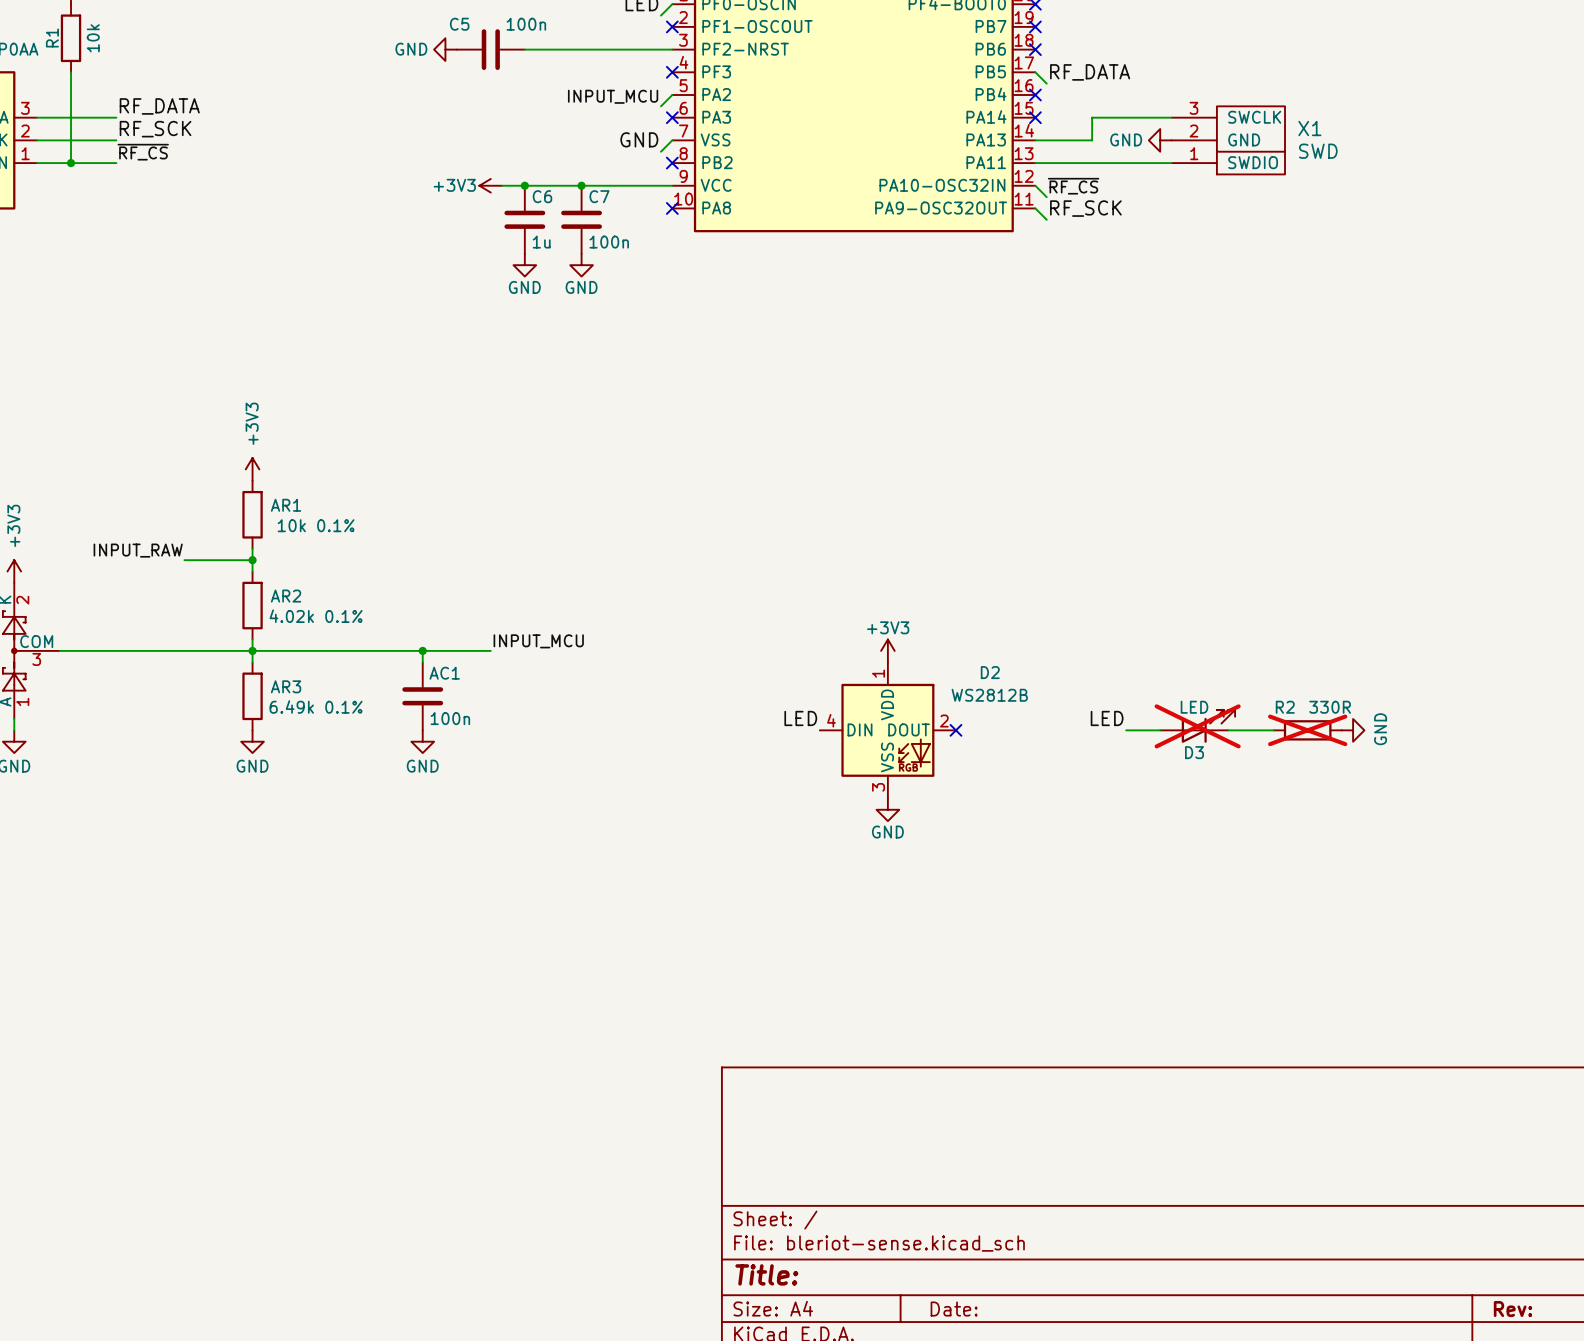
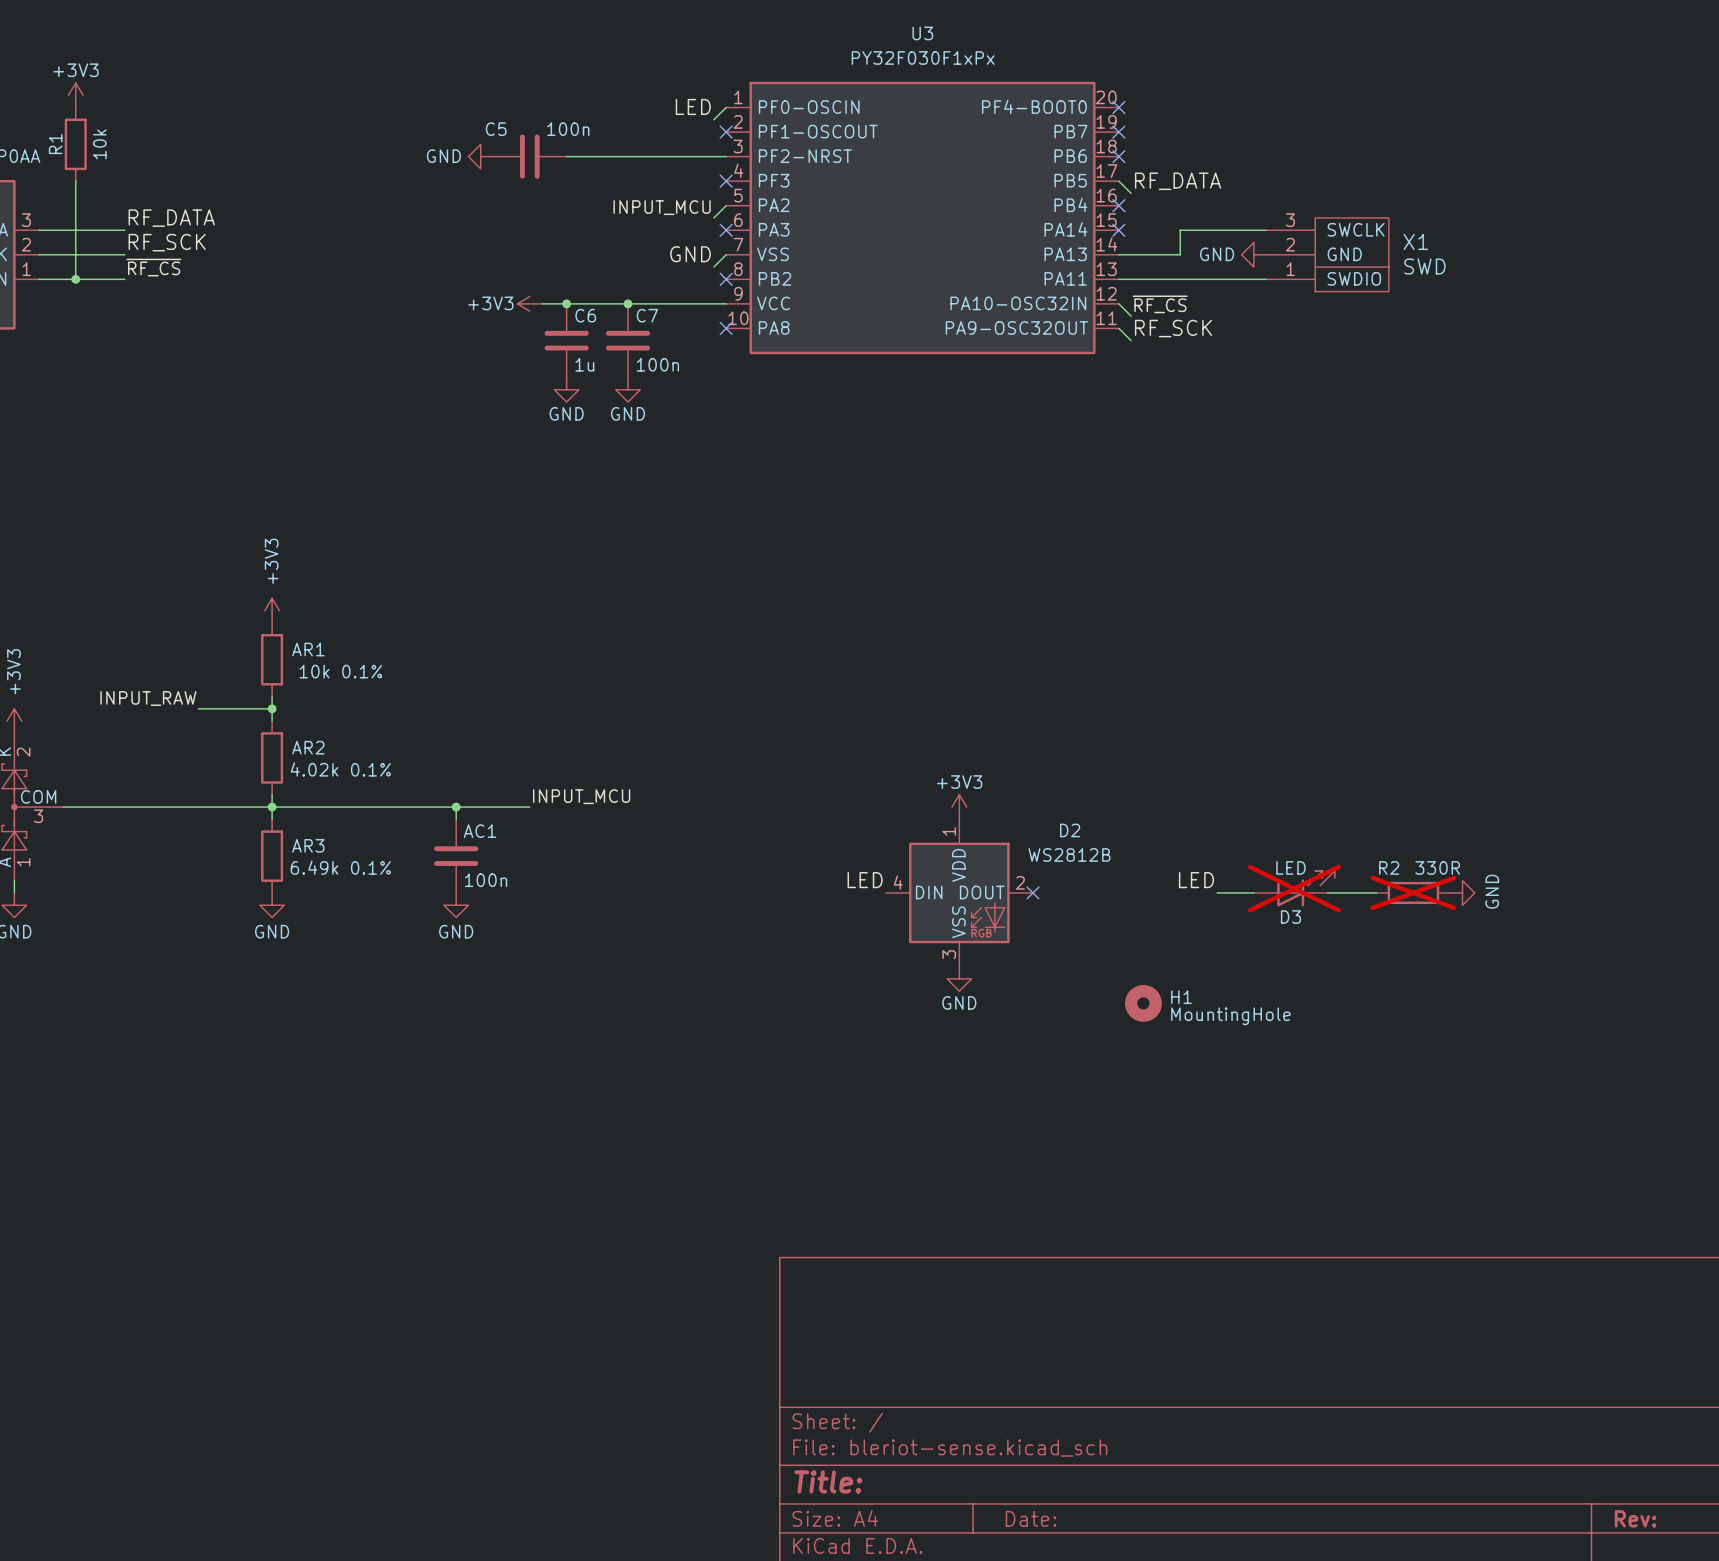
H1: none -> MountingHole (1143, 1003)

